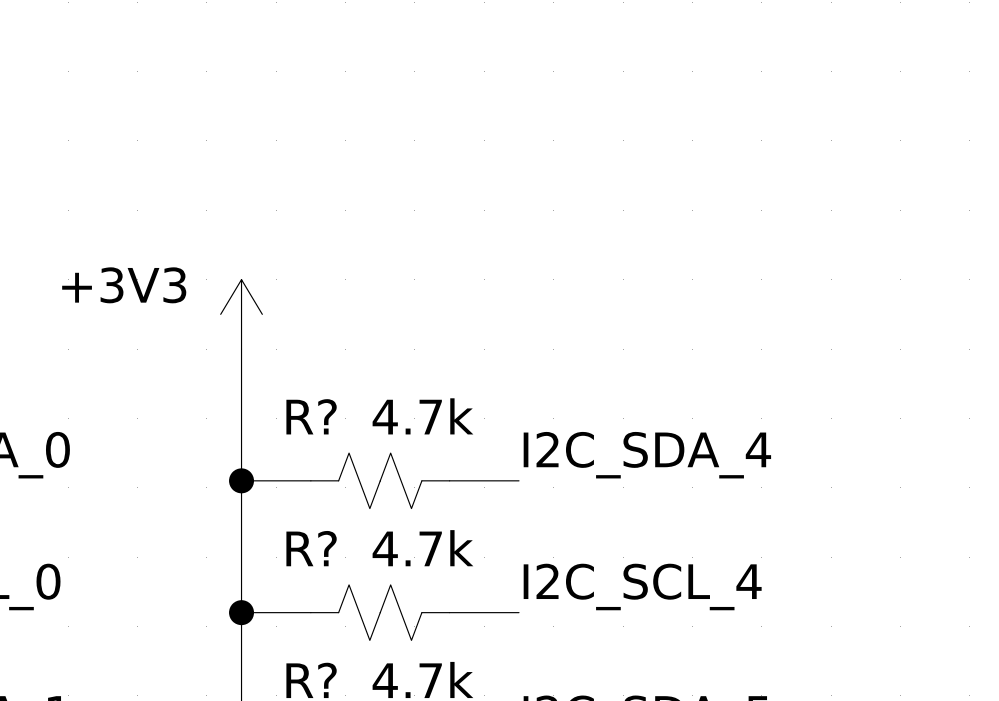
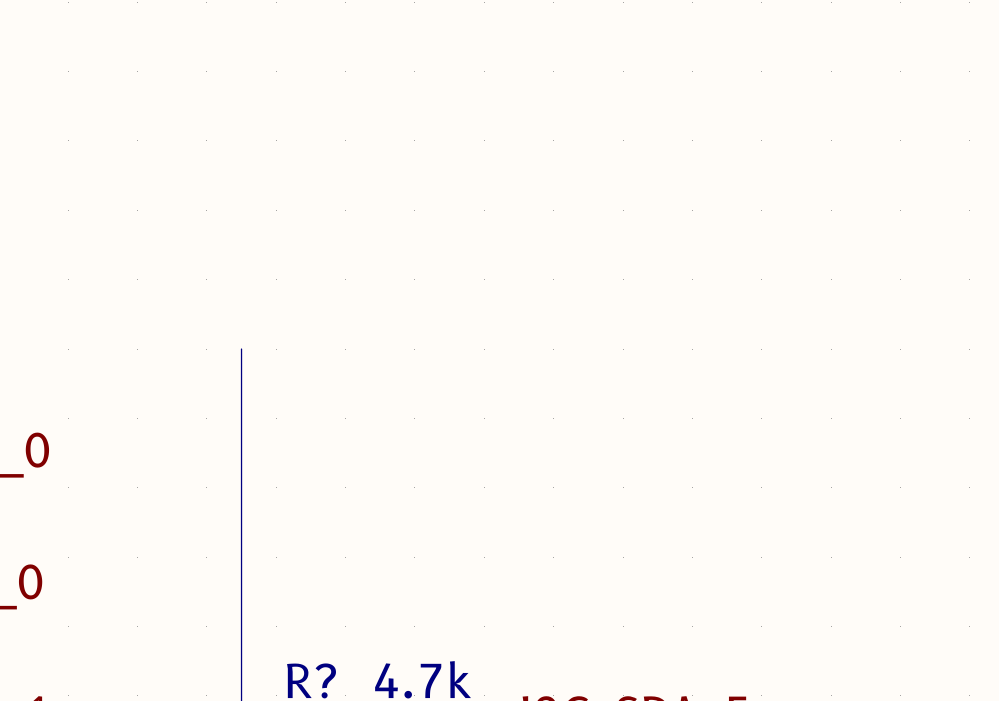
power symbol: +3V3 (241, 314) -> none
label: I2C_SDA_4 (647, 455) -> none
wire: (241, 480) (310, 480) -> none
junction: (241, 480) -> none
R?: 4.7k (380, 480) -> none
wire: (449, 480) (519, 480) -> none
label: I2C_SCL_4 (642, 586) -> none
wire: (241, 612) (310, 612) -> none
junction: (241, 612) -> none
R?: 4.7k (380, 612) -> none
wire: (449, 612) (519, 612) -> none

